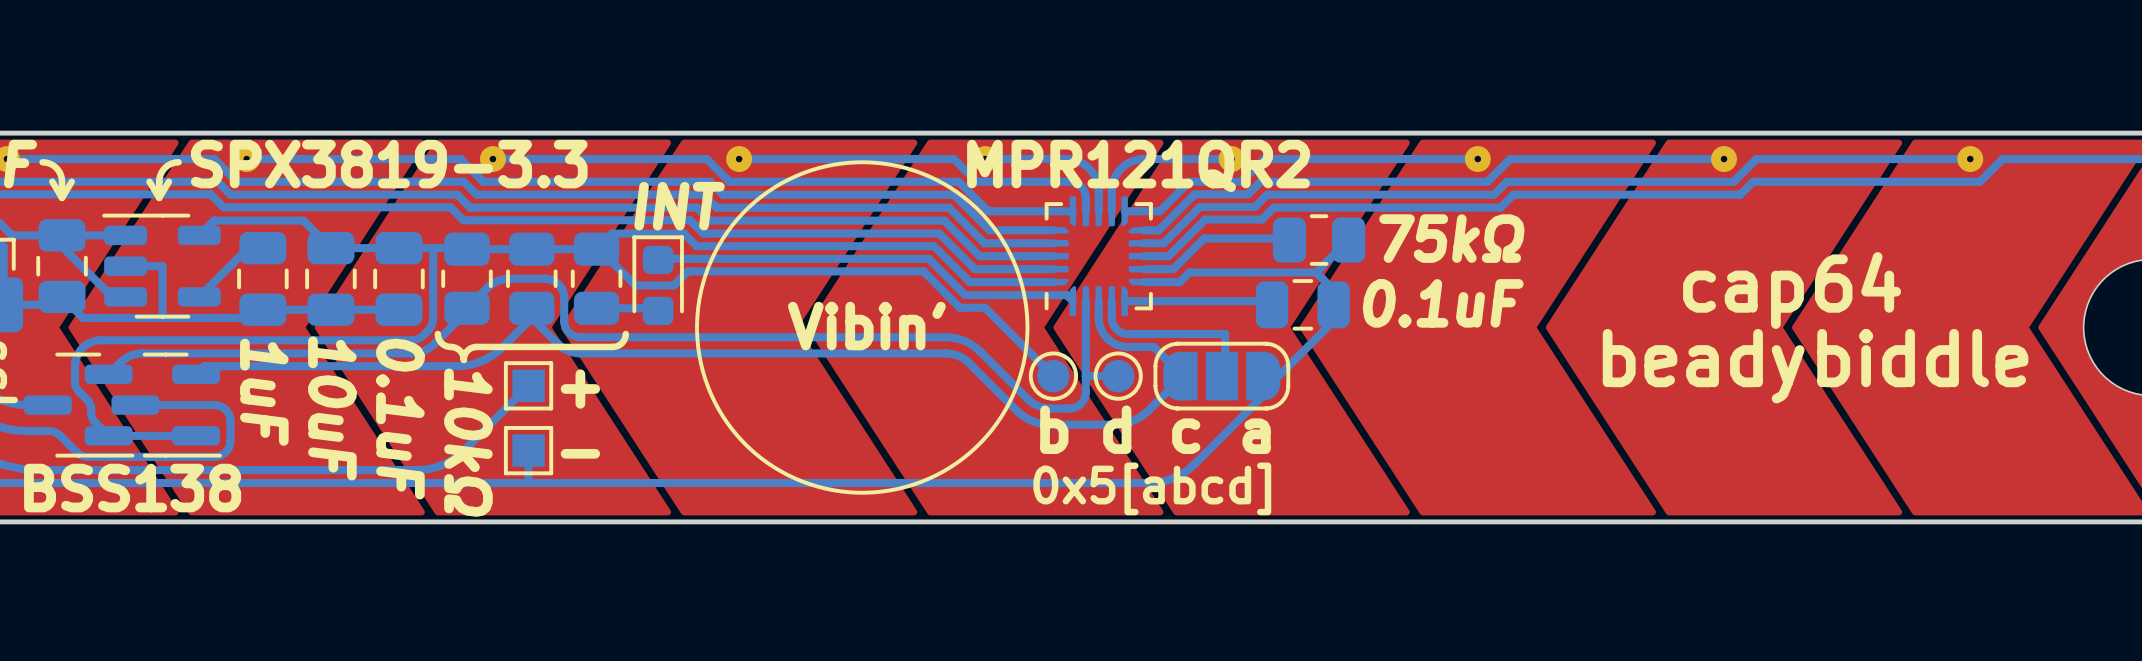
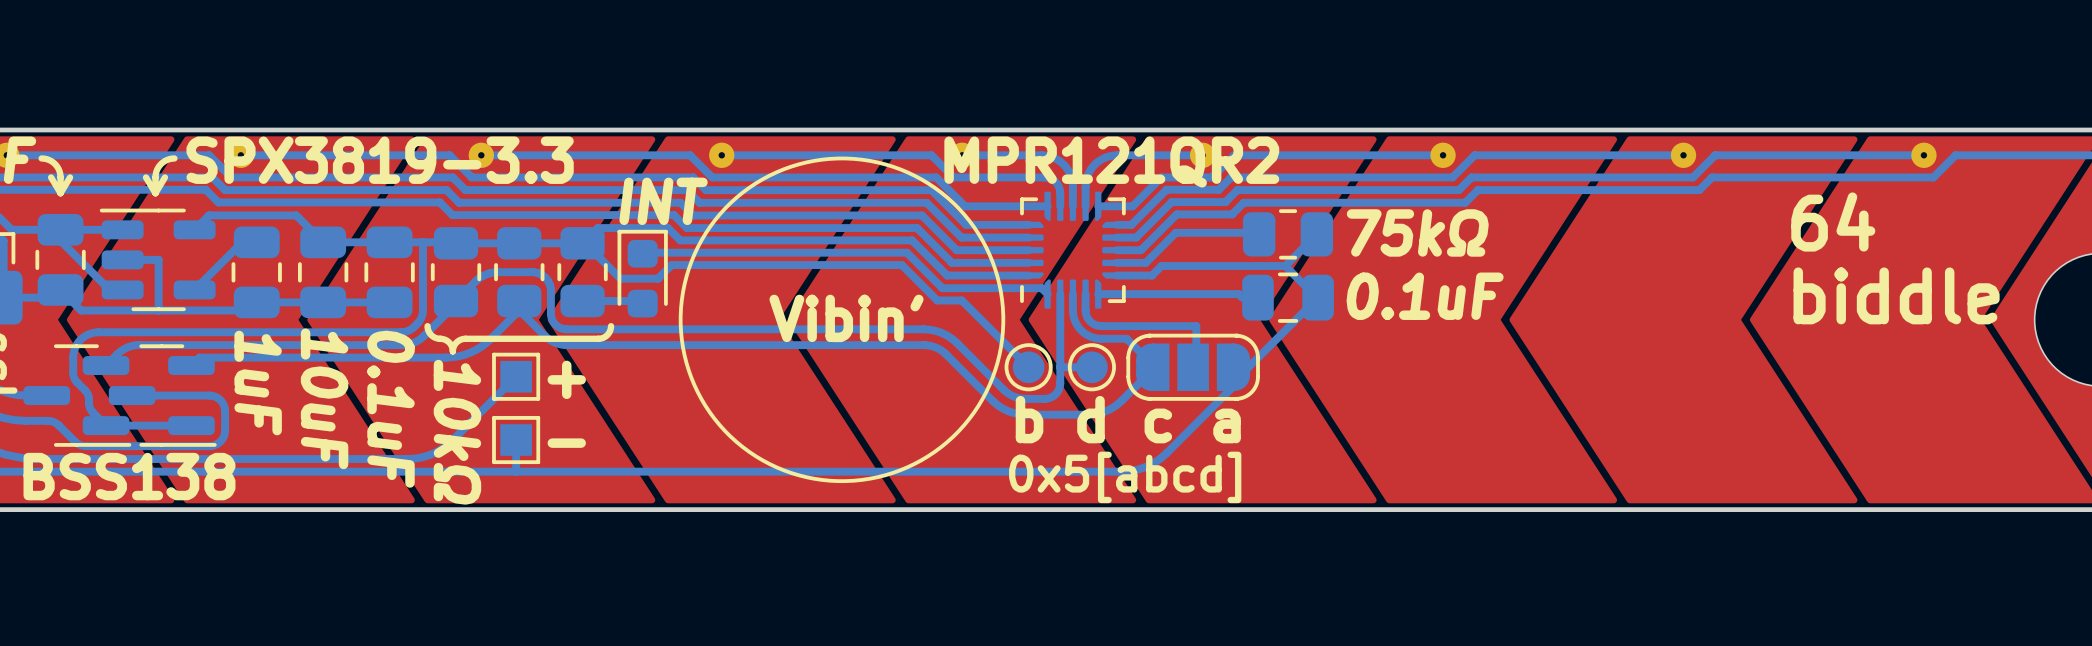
text position: 64 (1858, 282) -> 64 (1833, 222)
text: cap (1743, 299) -> none
part position: (1302, 304) -> (1288, 297)
text position: biddle (1922, 358) -> biddle (1896, 295)
text: beady (1703, 366) -> none

